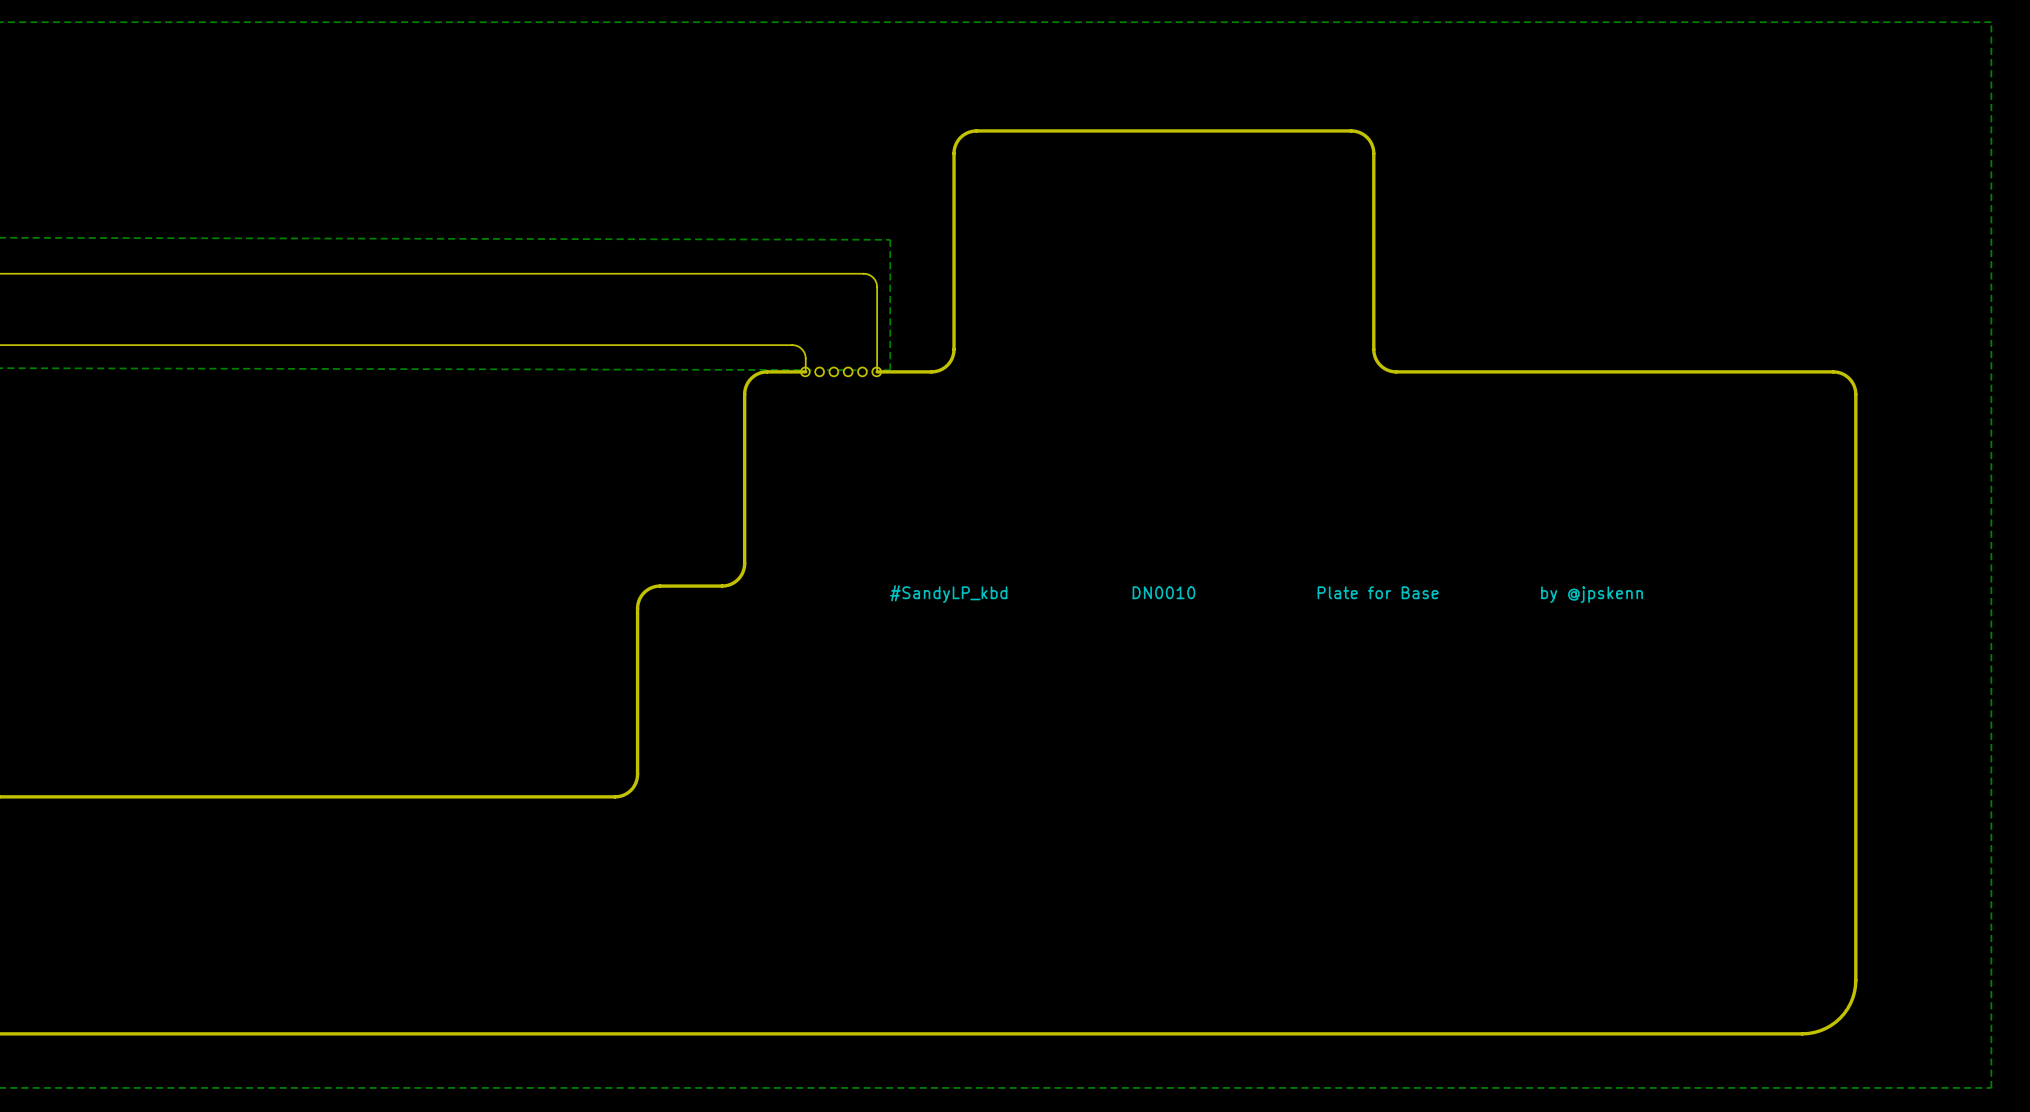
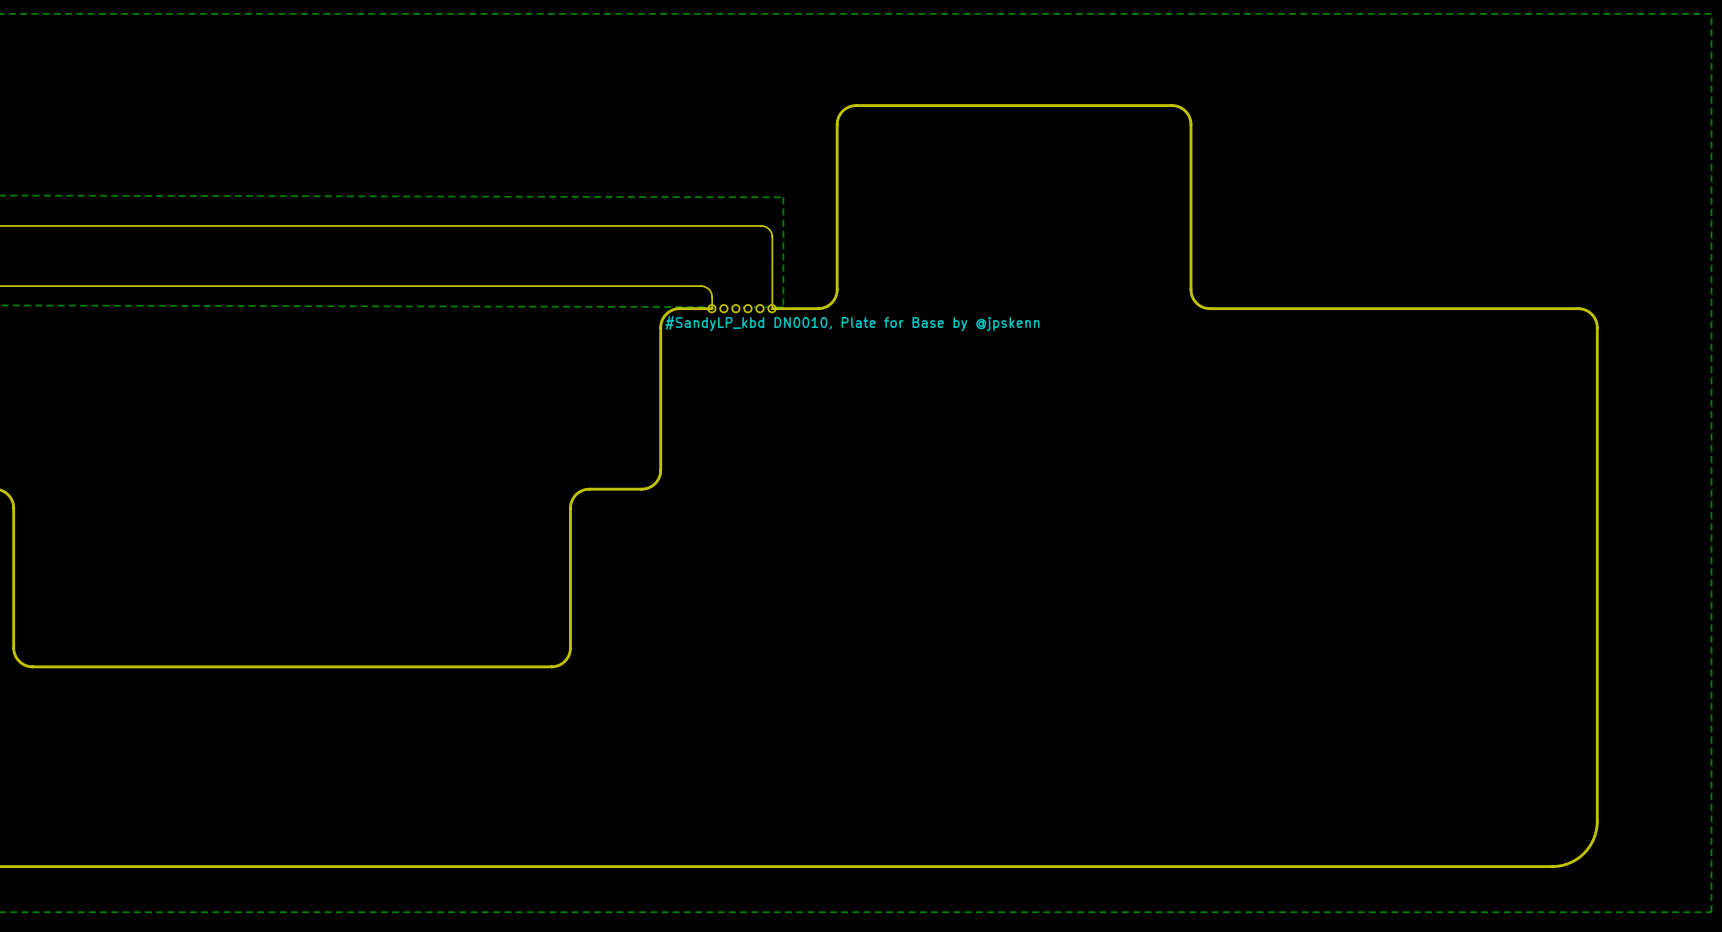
text: none -> #SandyLP_kbd DN0010, Plate for Base by @jpskenn (852, 323)
text: DN0010 (1163, 592) -> none
text: Plate for Base (1378, 592) -> none
text: #SandyLP_kbd (948, 594) -> none
text: by @jpskenn (1592, 594) -> none

